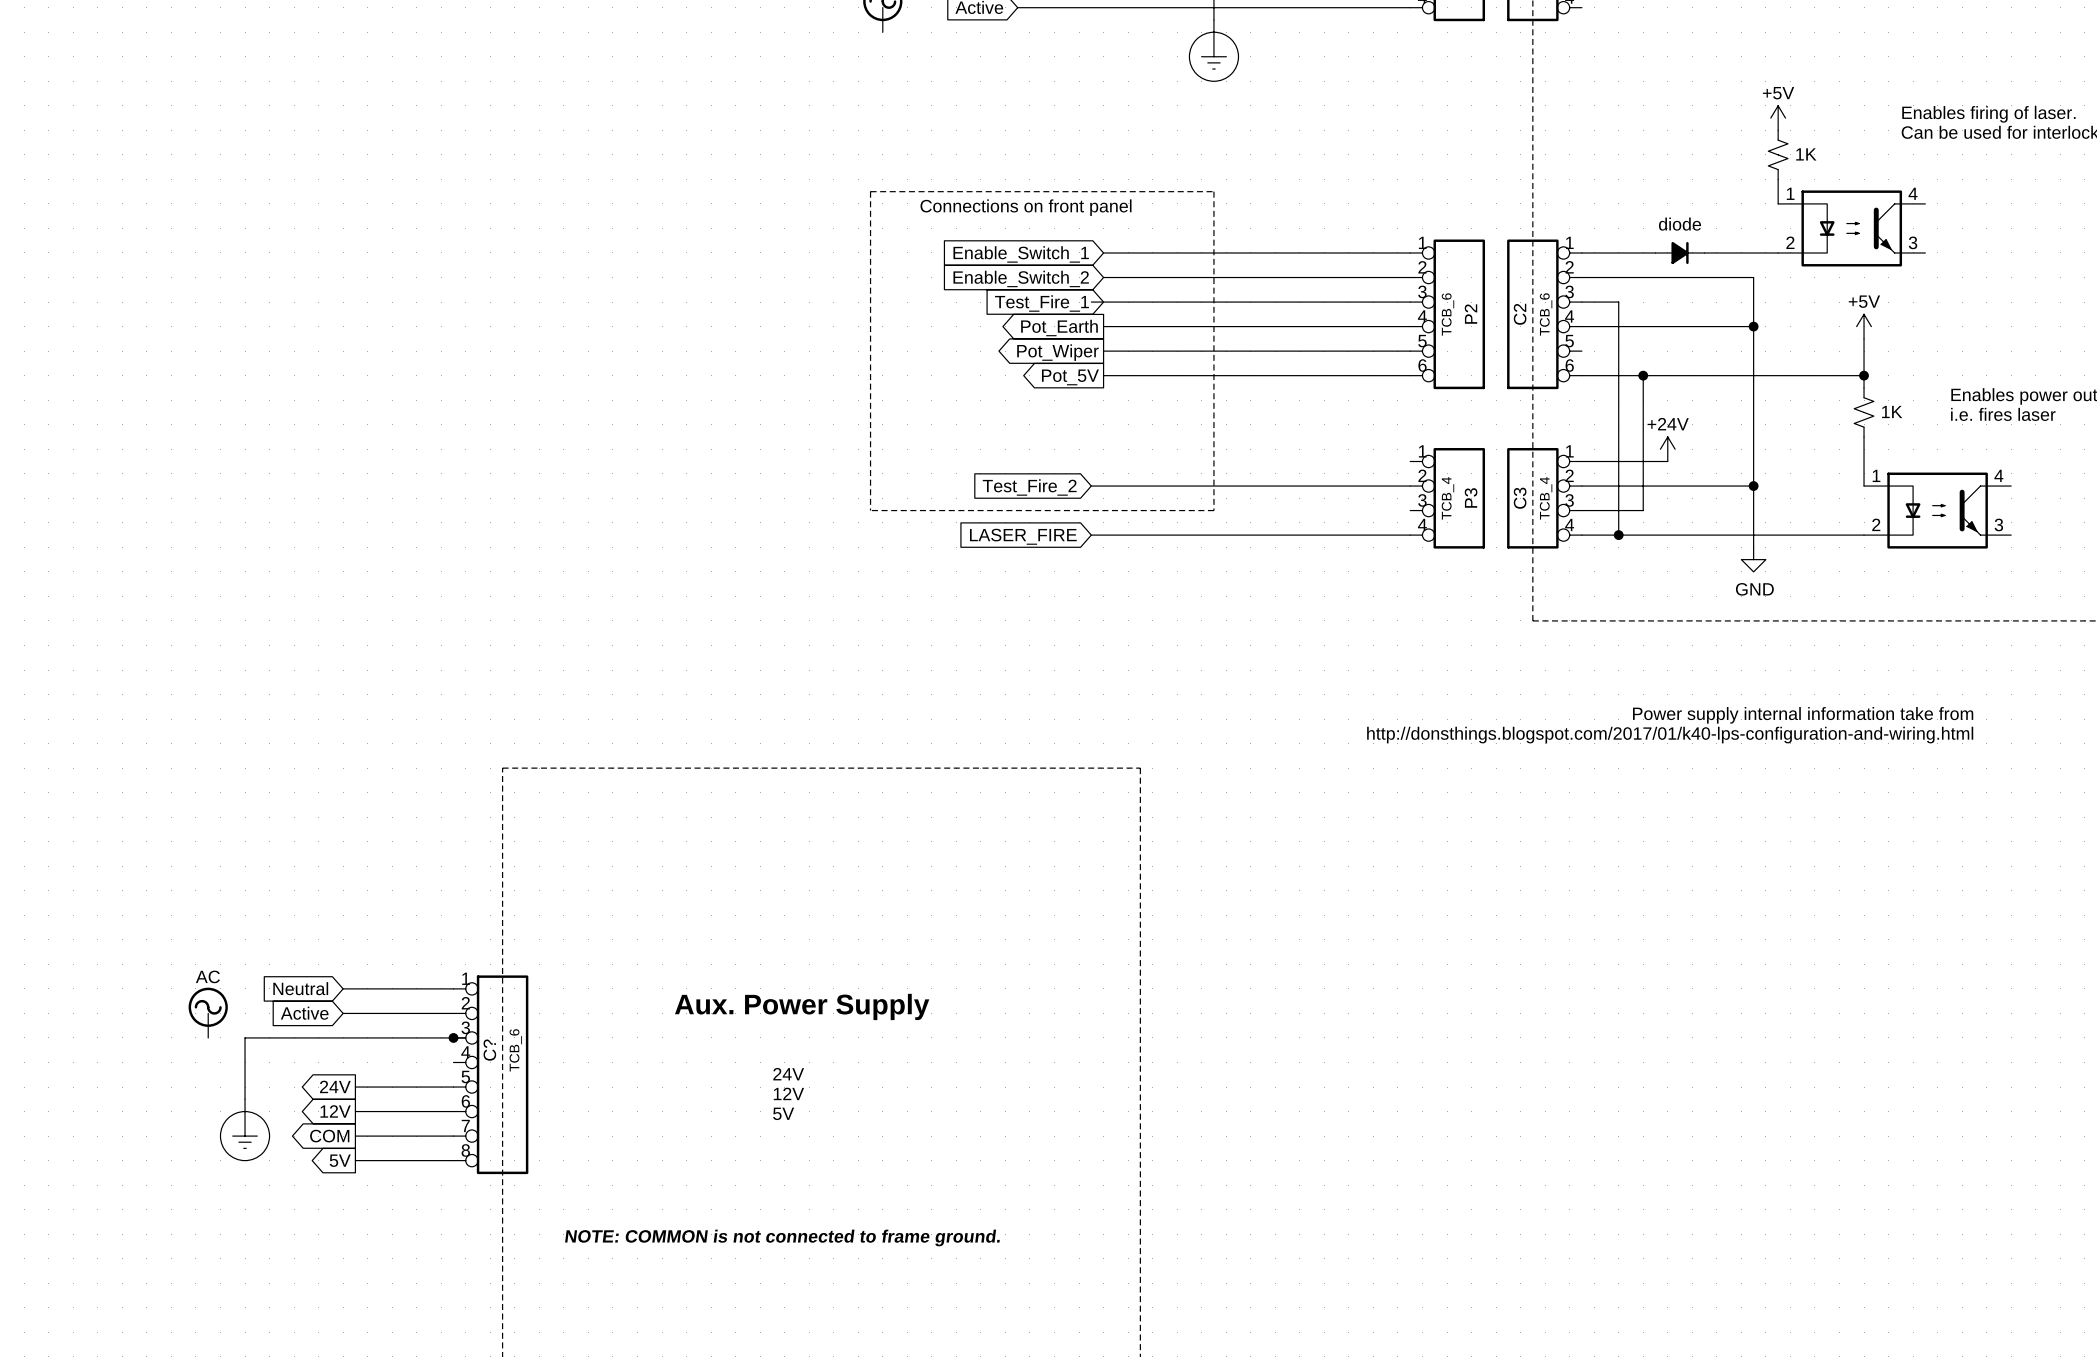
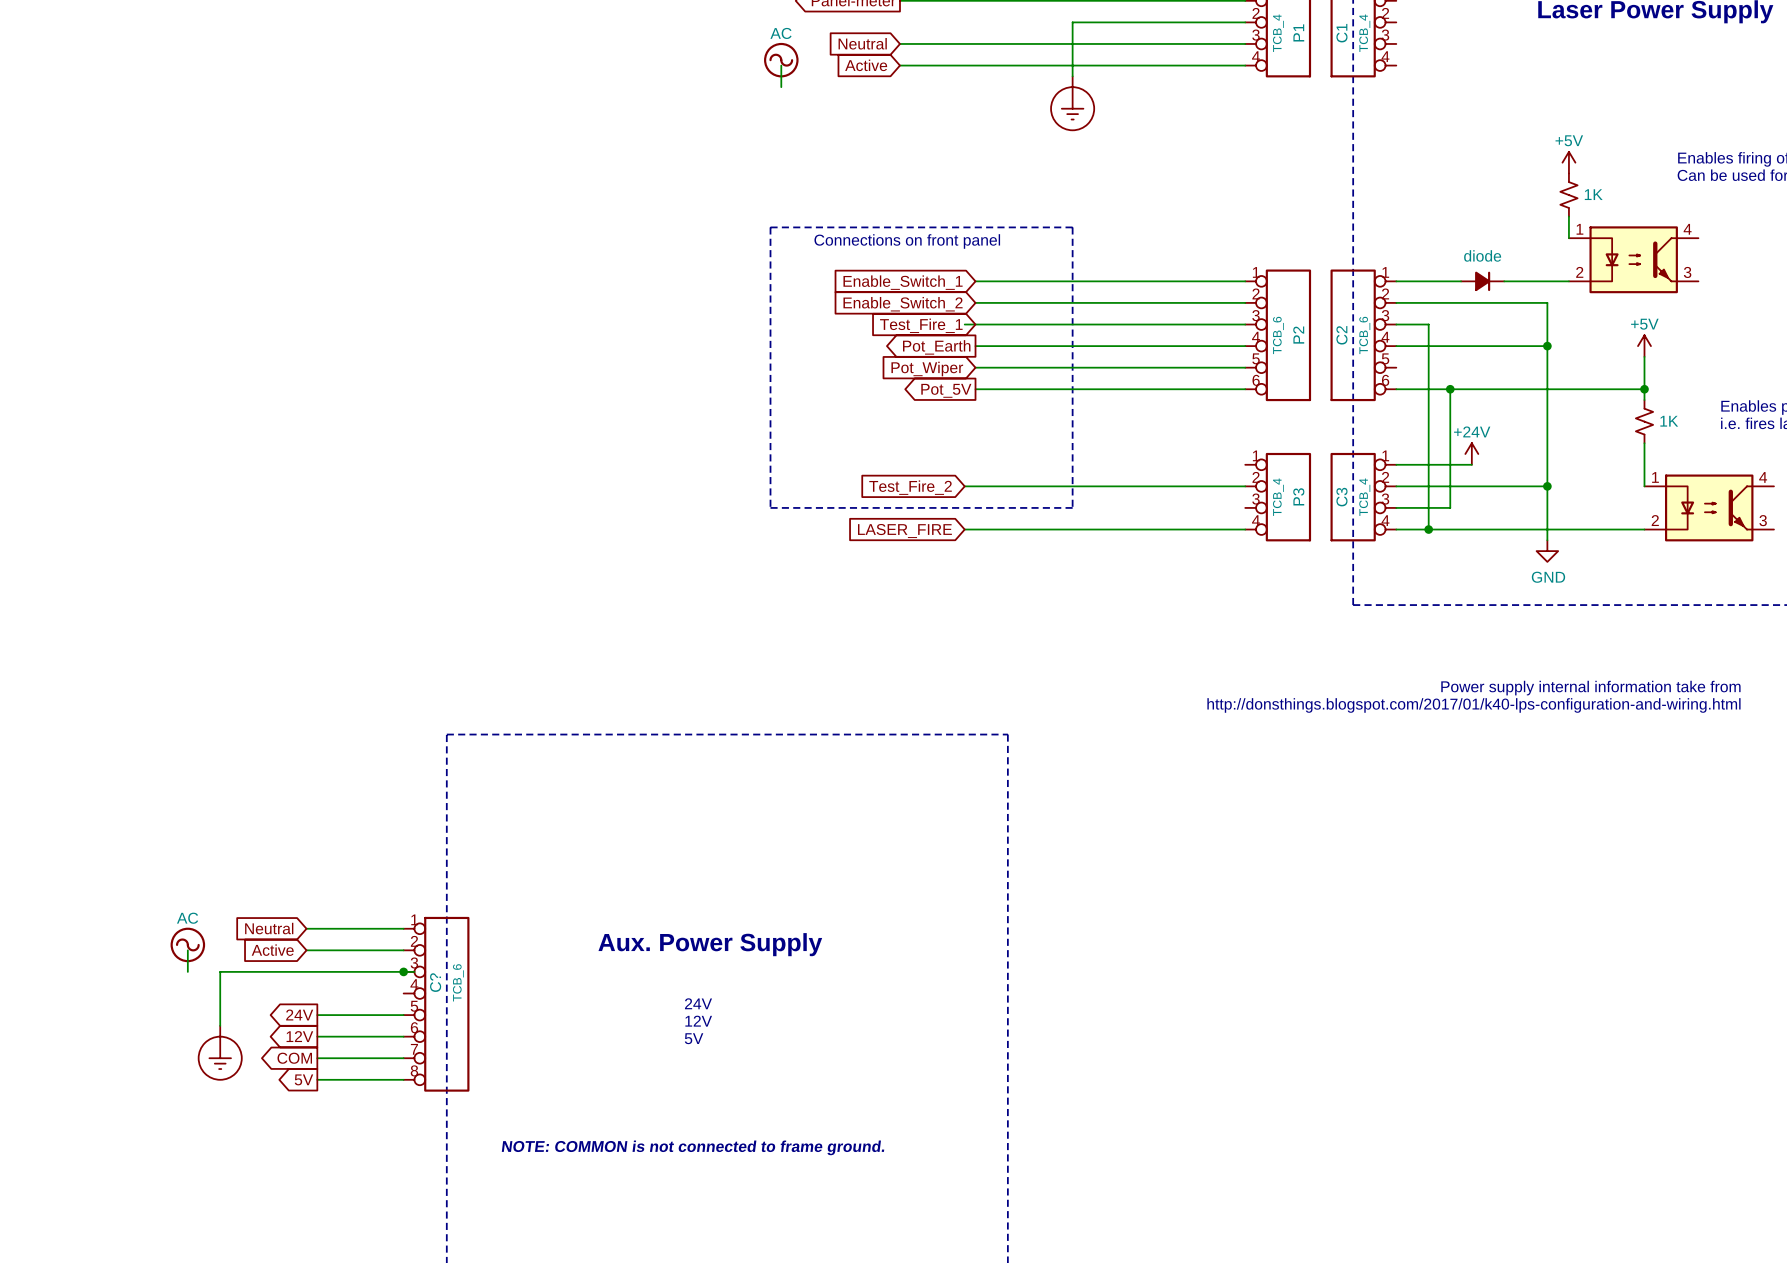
global label shape: output (1057, 352) -> input (927, 369)

